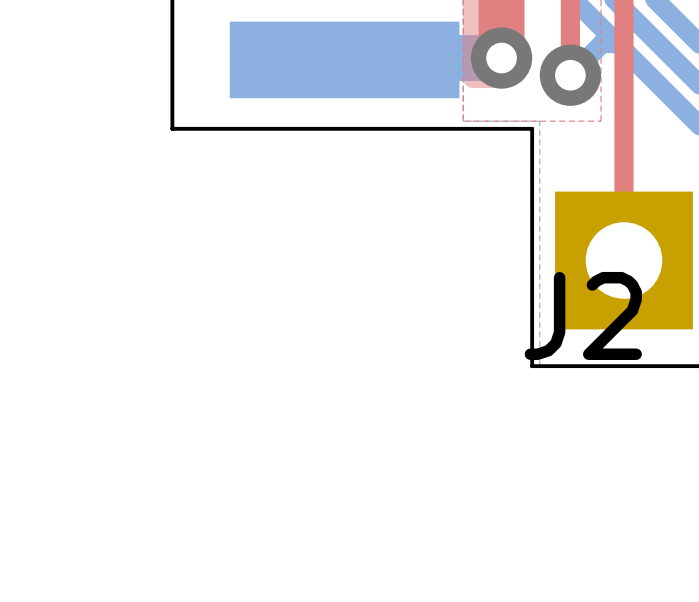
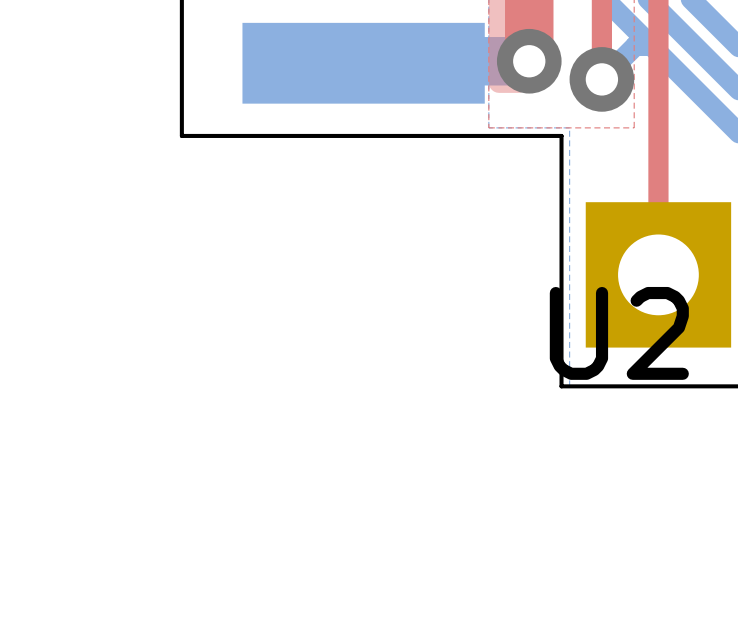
J2 name: J2 (583, 315) -> U2 (619, 333)

